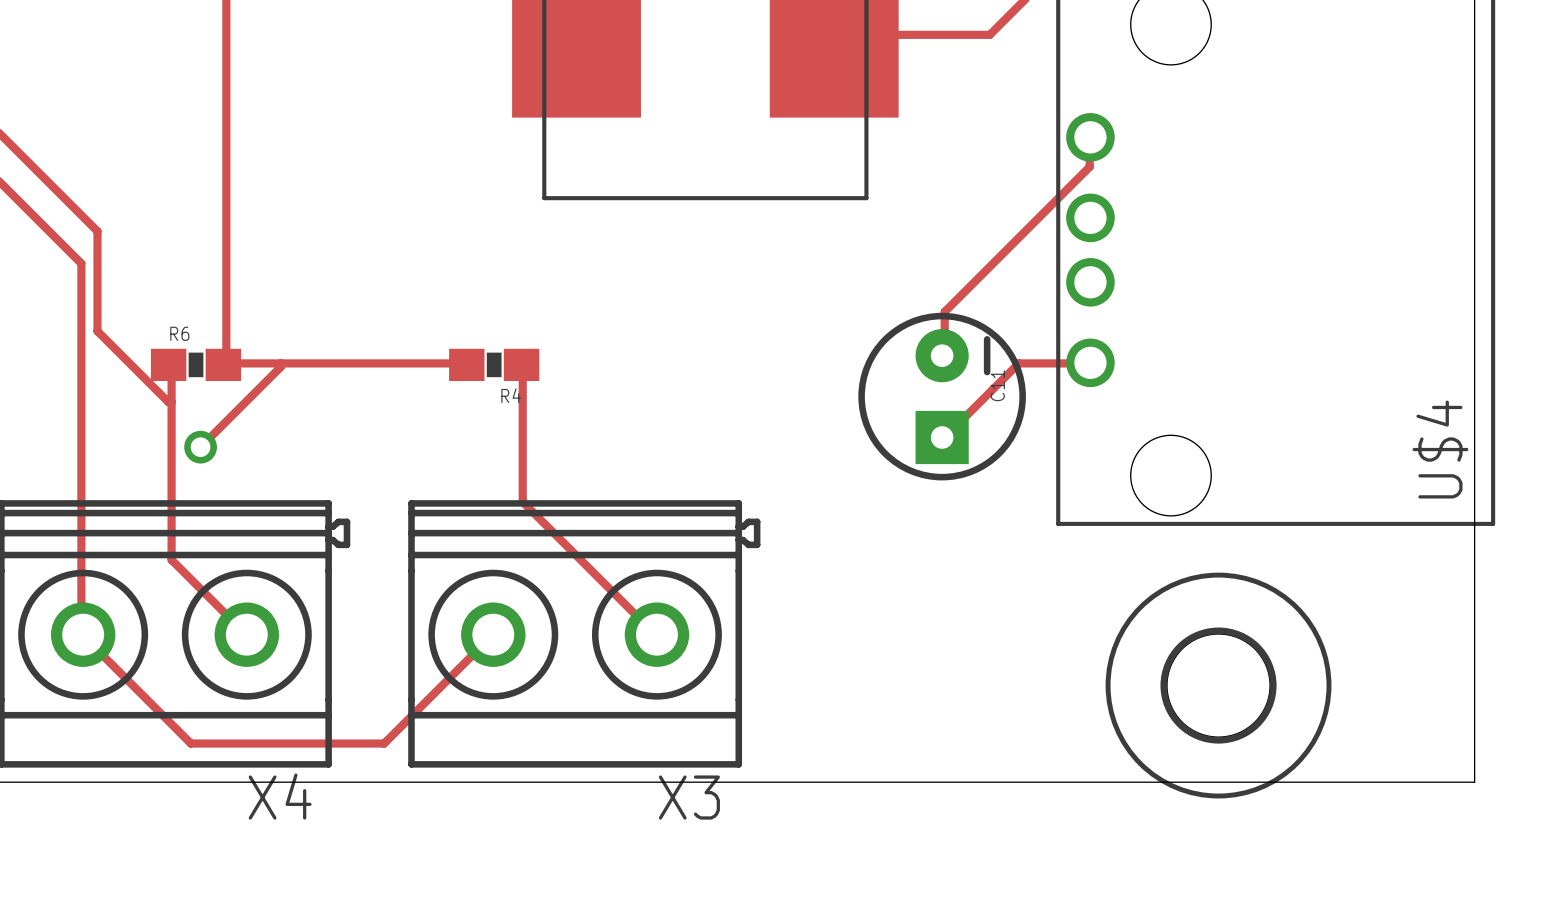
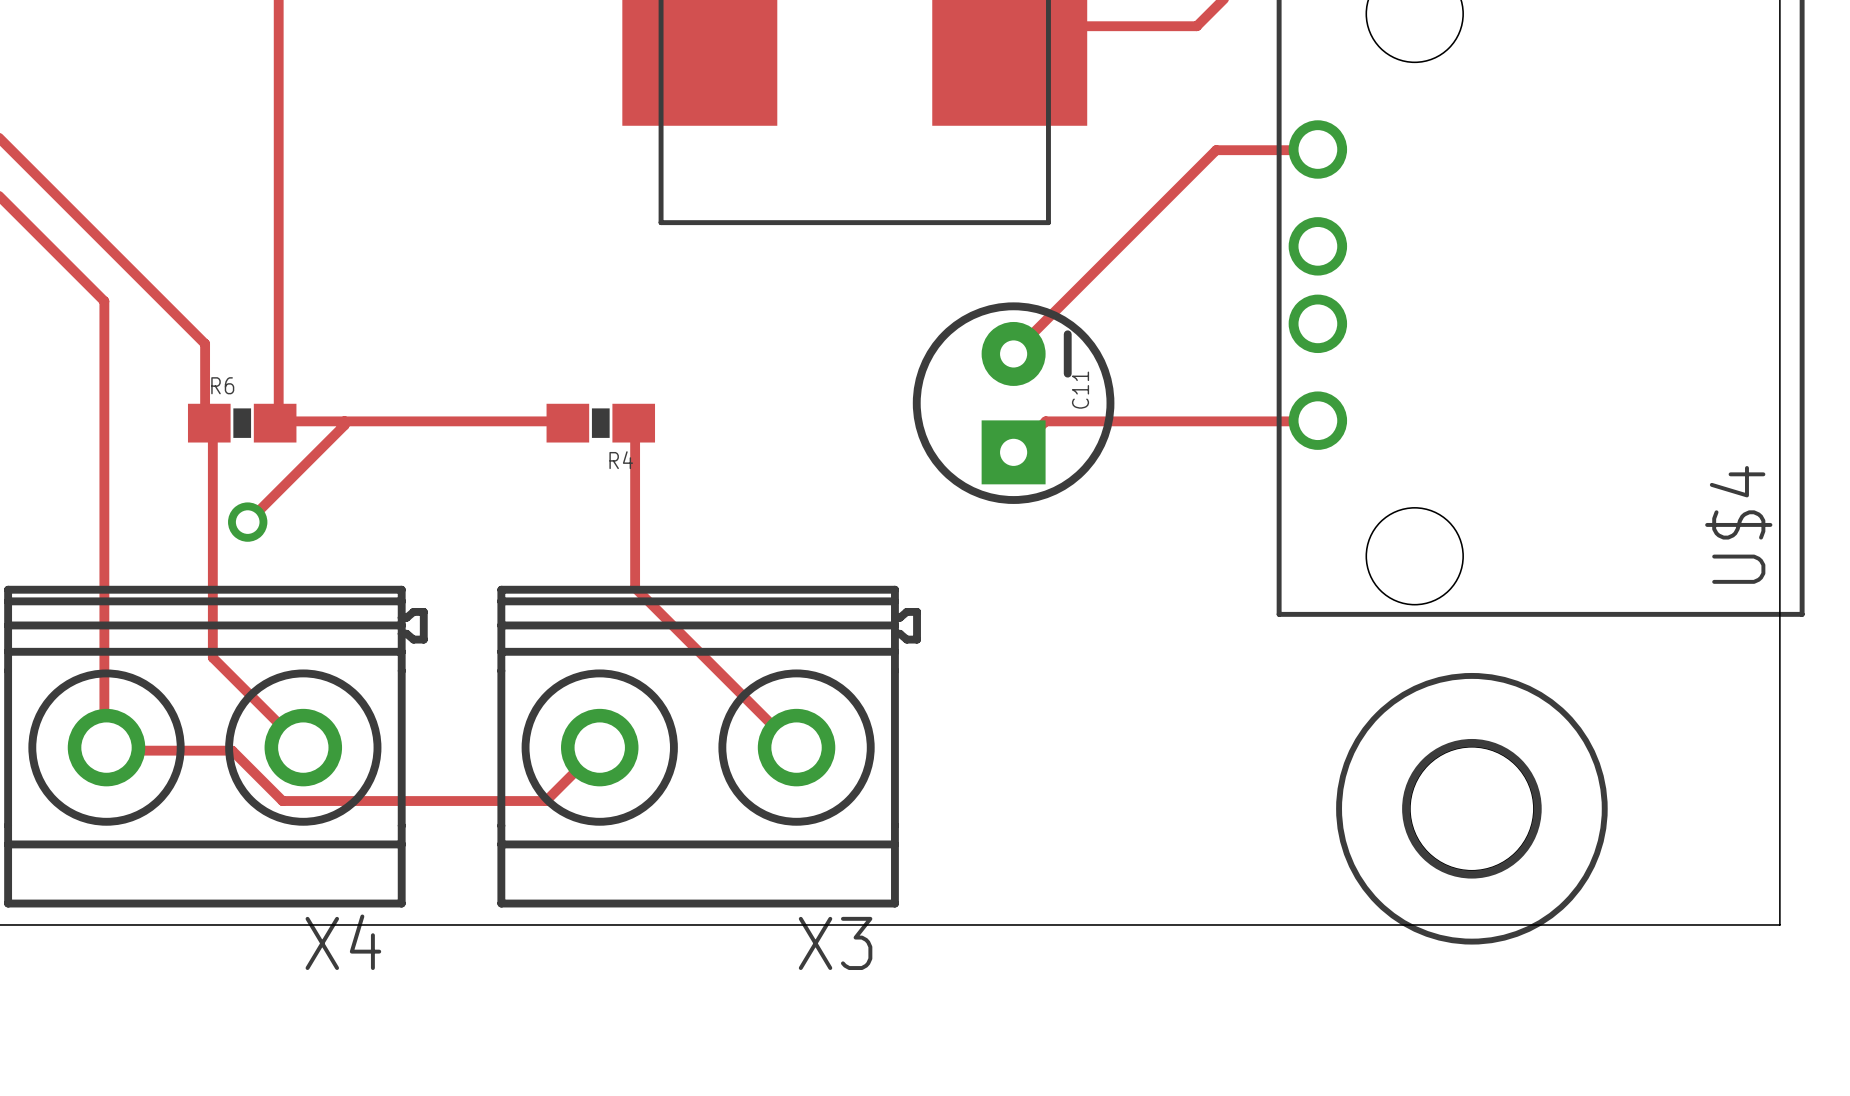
track: (1089, 137) (1089, 166) (944, 311) (944, 353) (942, 355) -> (1316, 150) (1216, 150) (1013, 353)
track: (97, 231) (97, 331) (168, 402) (171, 402) -> (123, 262) (205, 343) (205, 421) (209, 423)
track: (1018, 363) (944, 437) (942, 437) -> (1231, 421) (1045, 421) (1013, 452)
C11 position: (942, 396) -> (1013, 403)
track: (84, 637) (190, 743) (384, 743) (448, 679) -> (108, 750) (232, 750) (282, 801) (546, 801)

